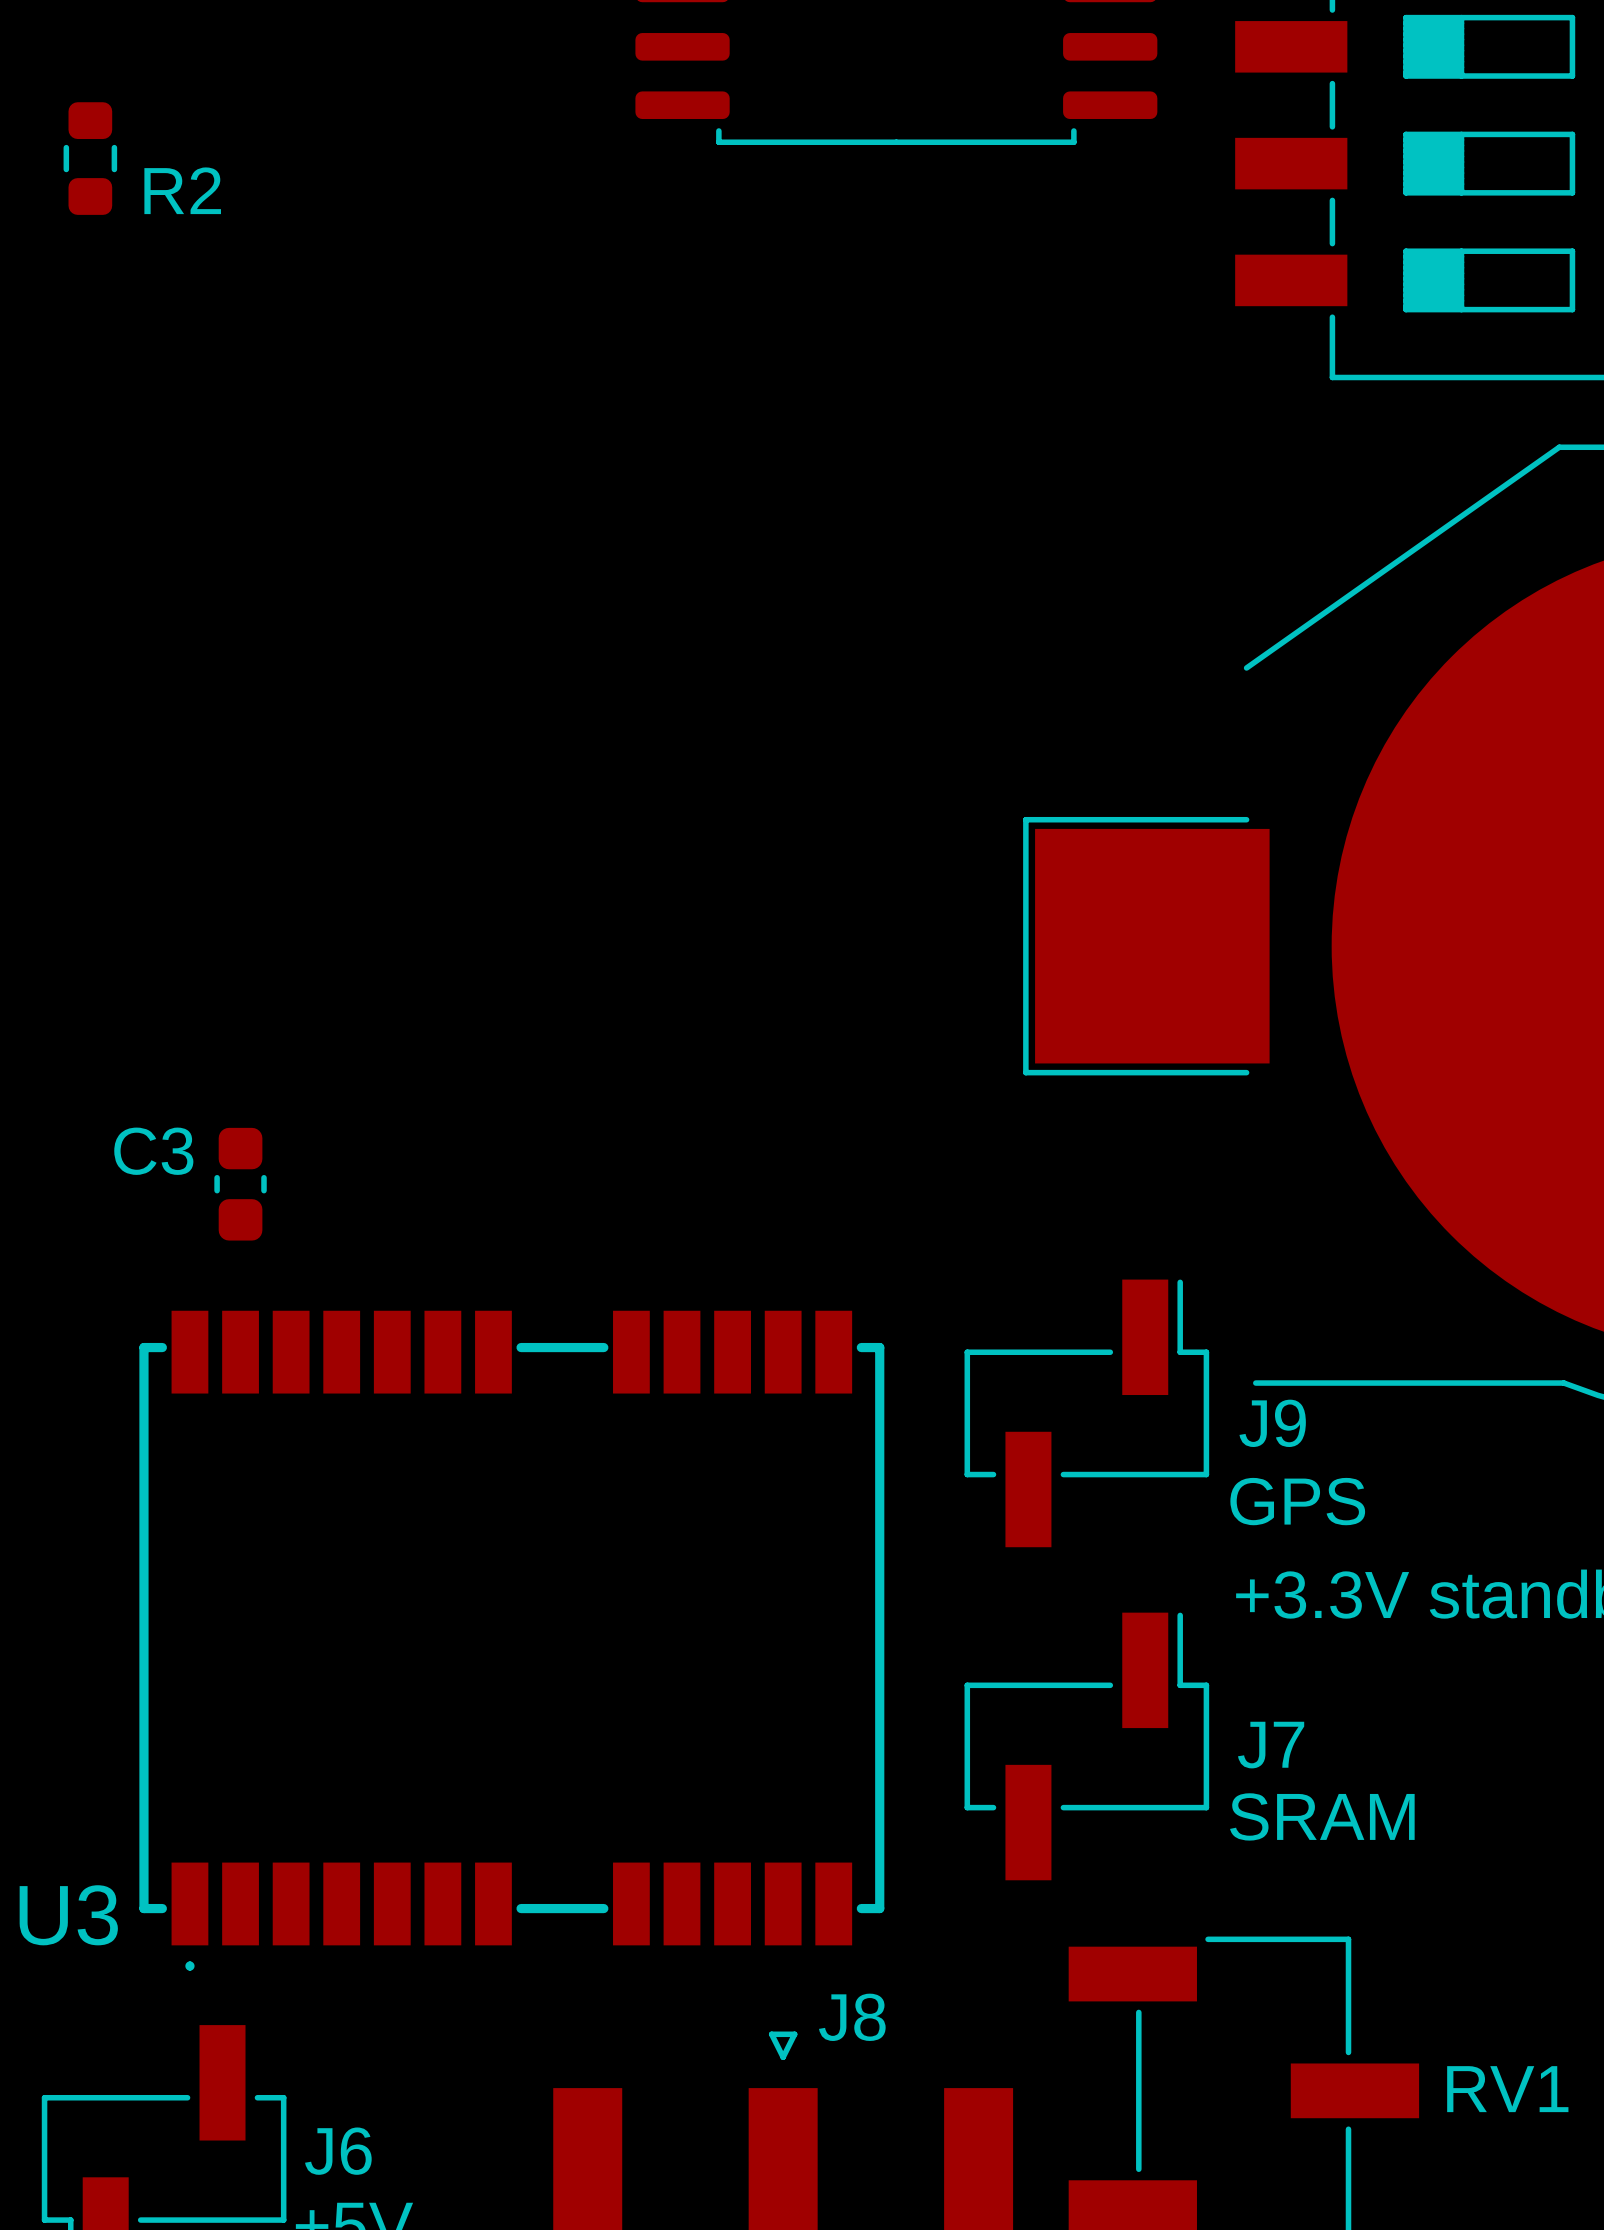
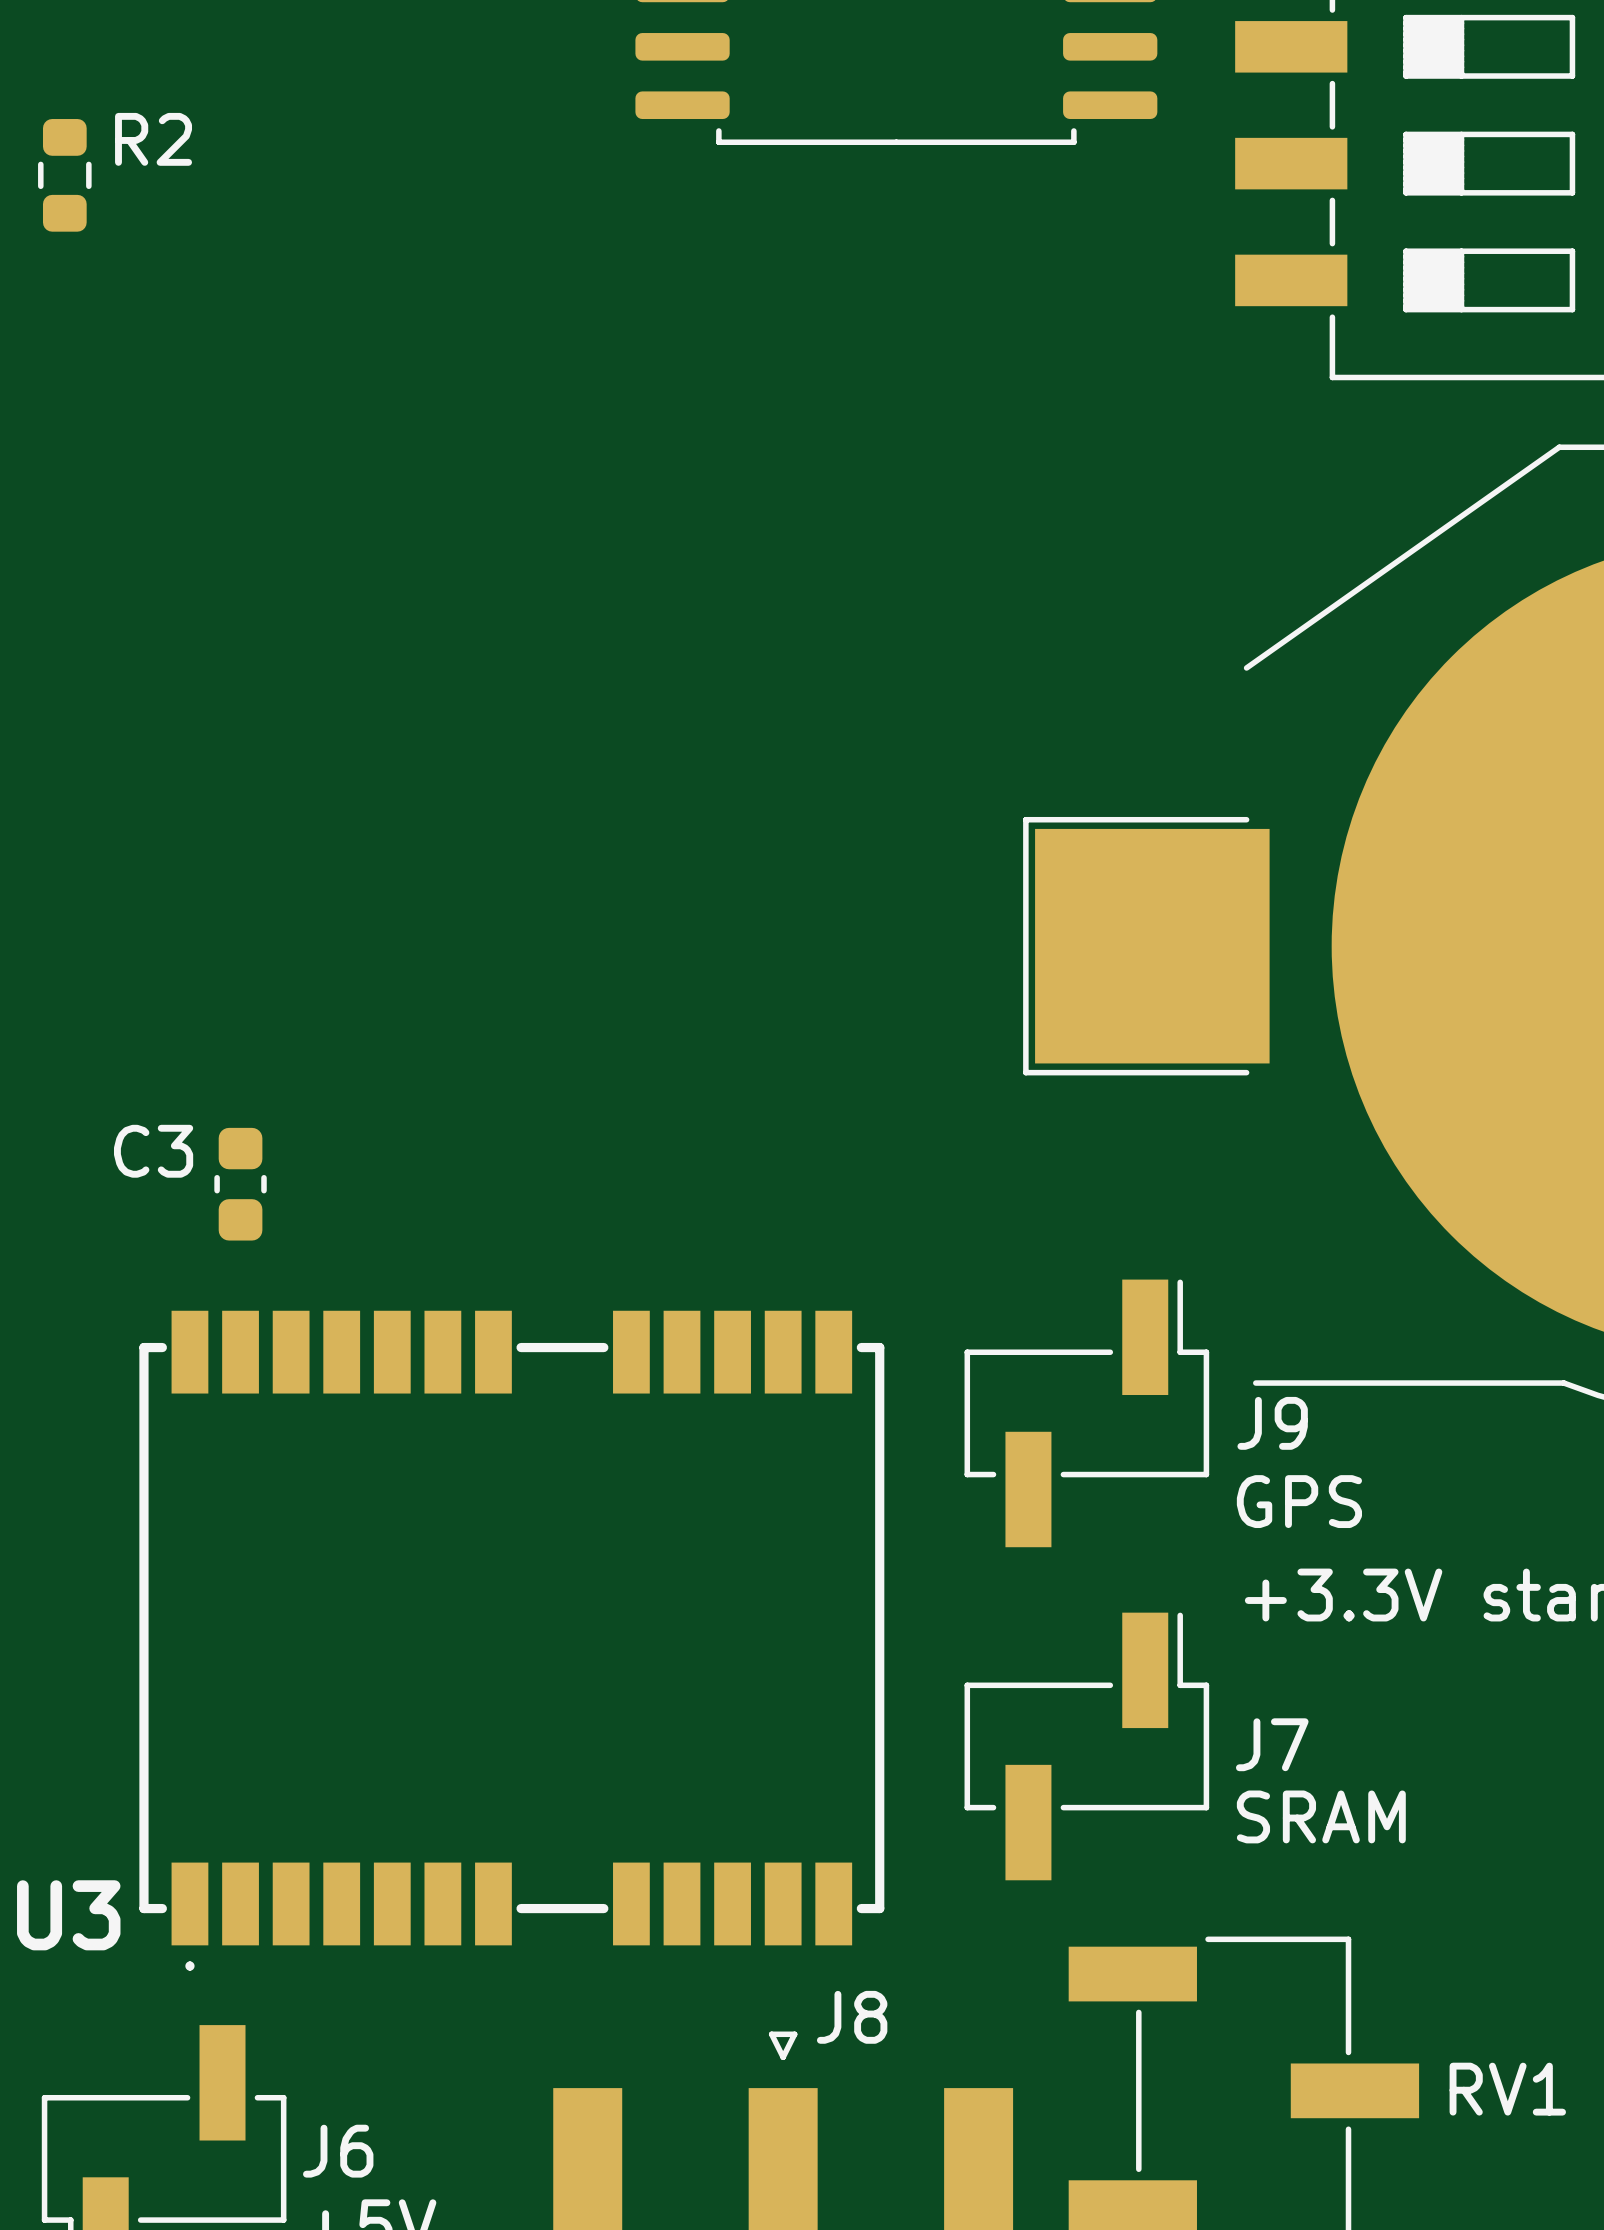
R2 position: (90, 158) -> (64, 175)
R2 name position: R2 (182, 190) -> R2 (153, 139)

